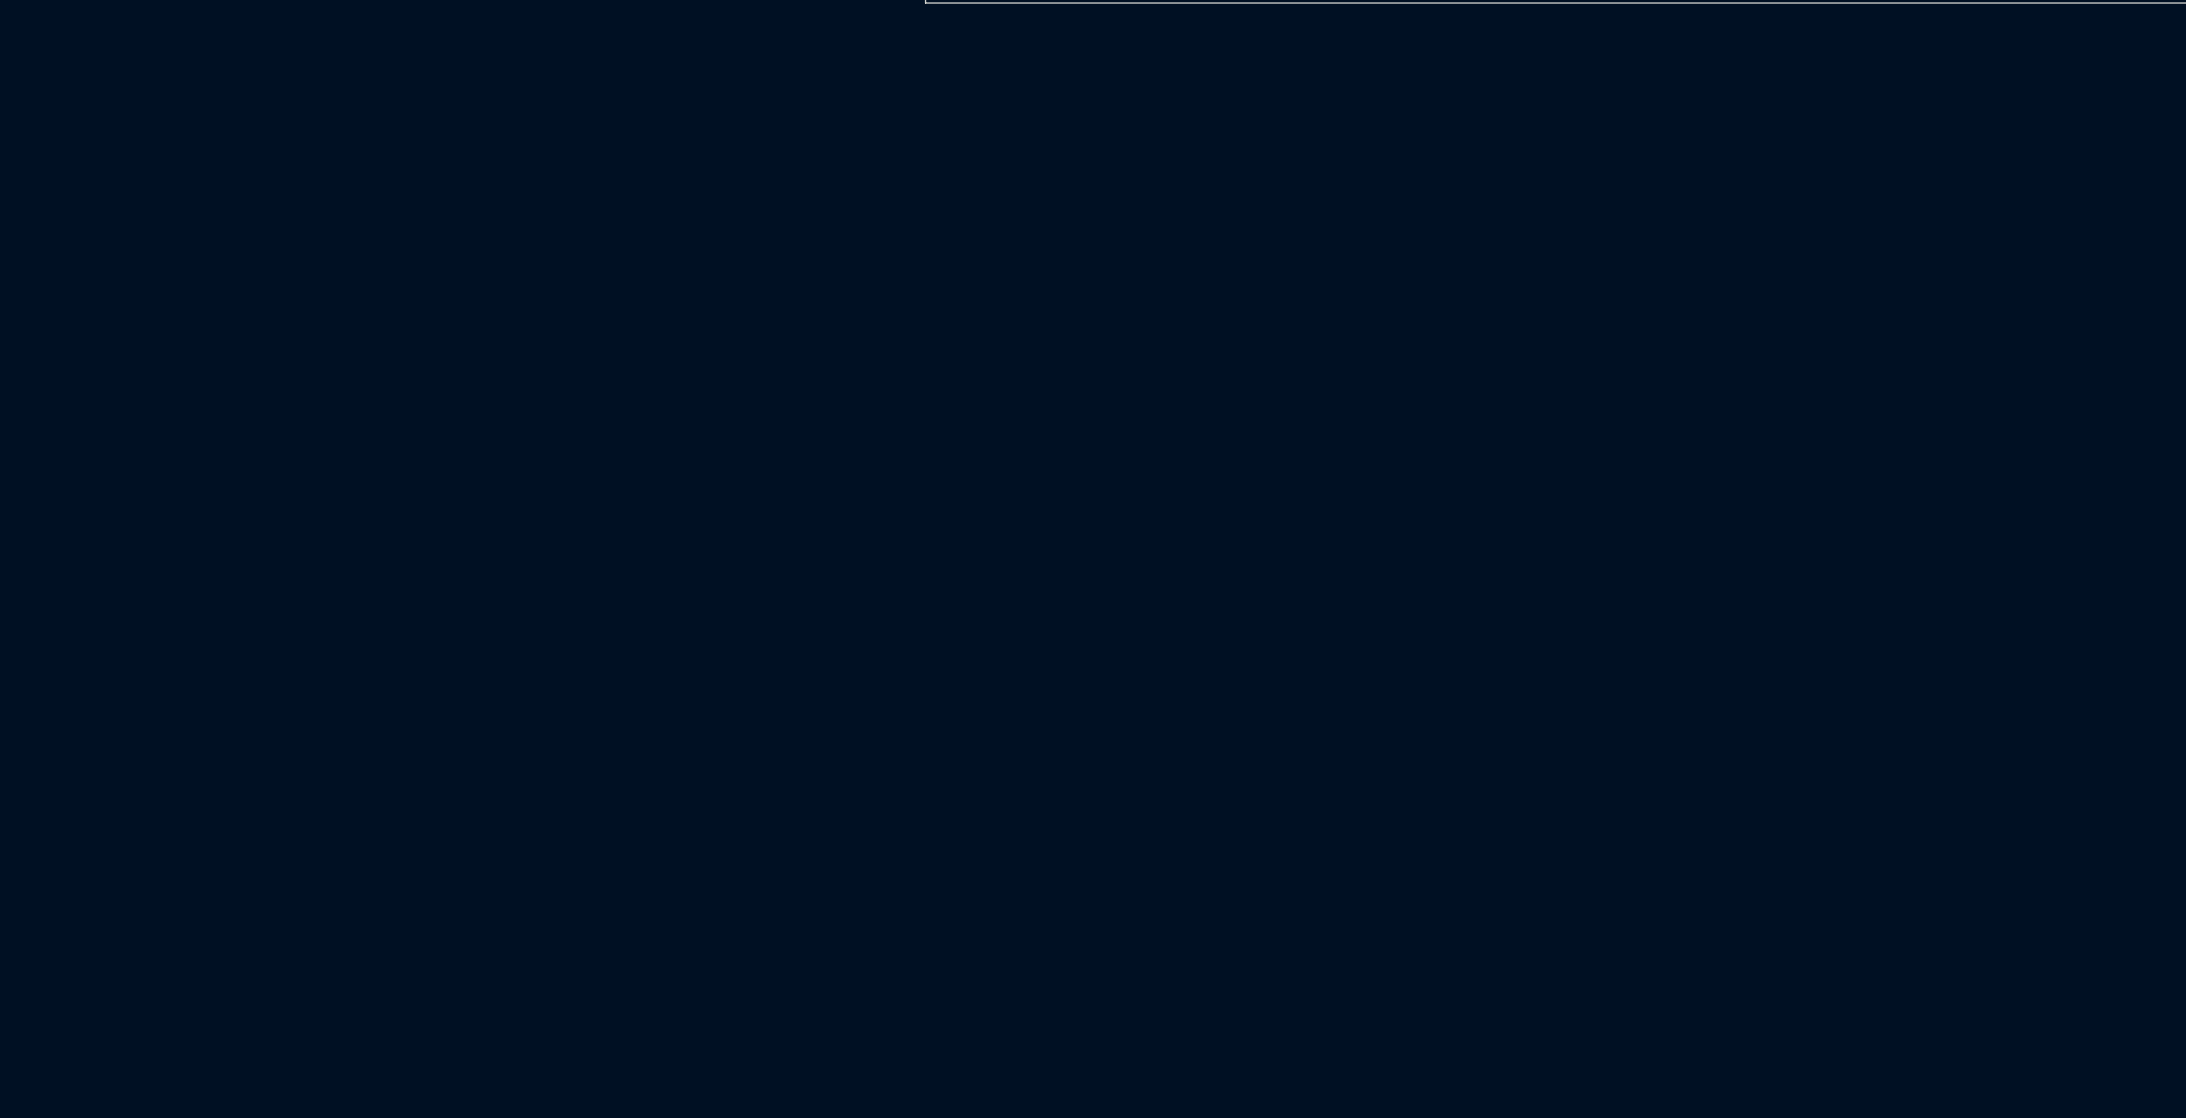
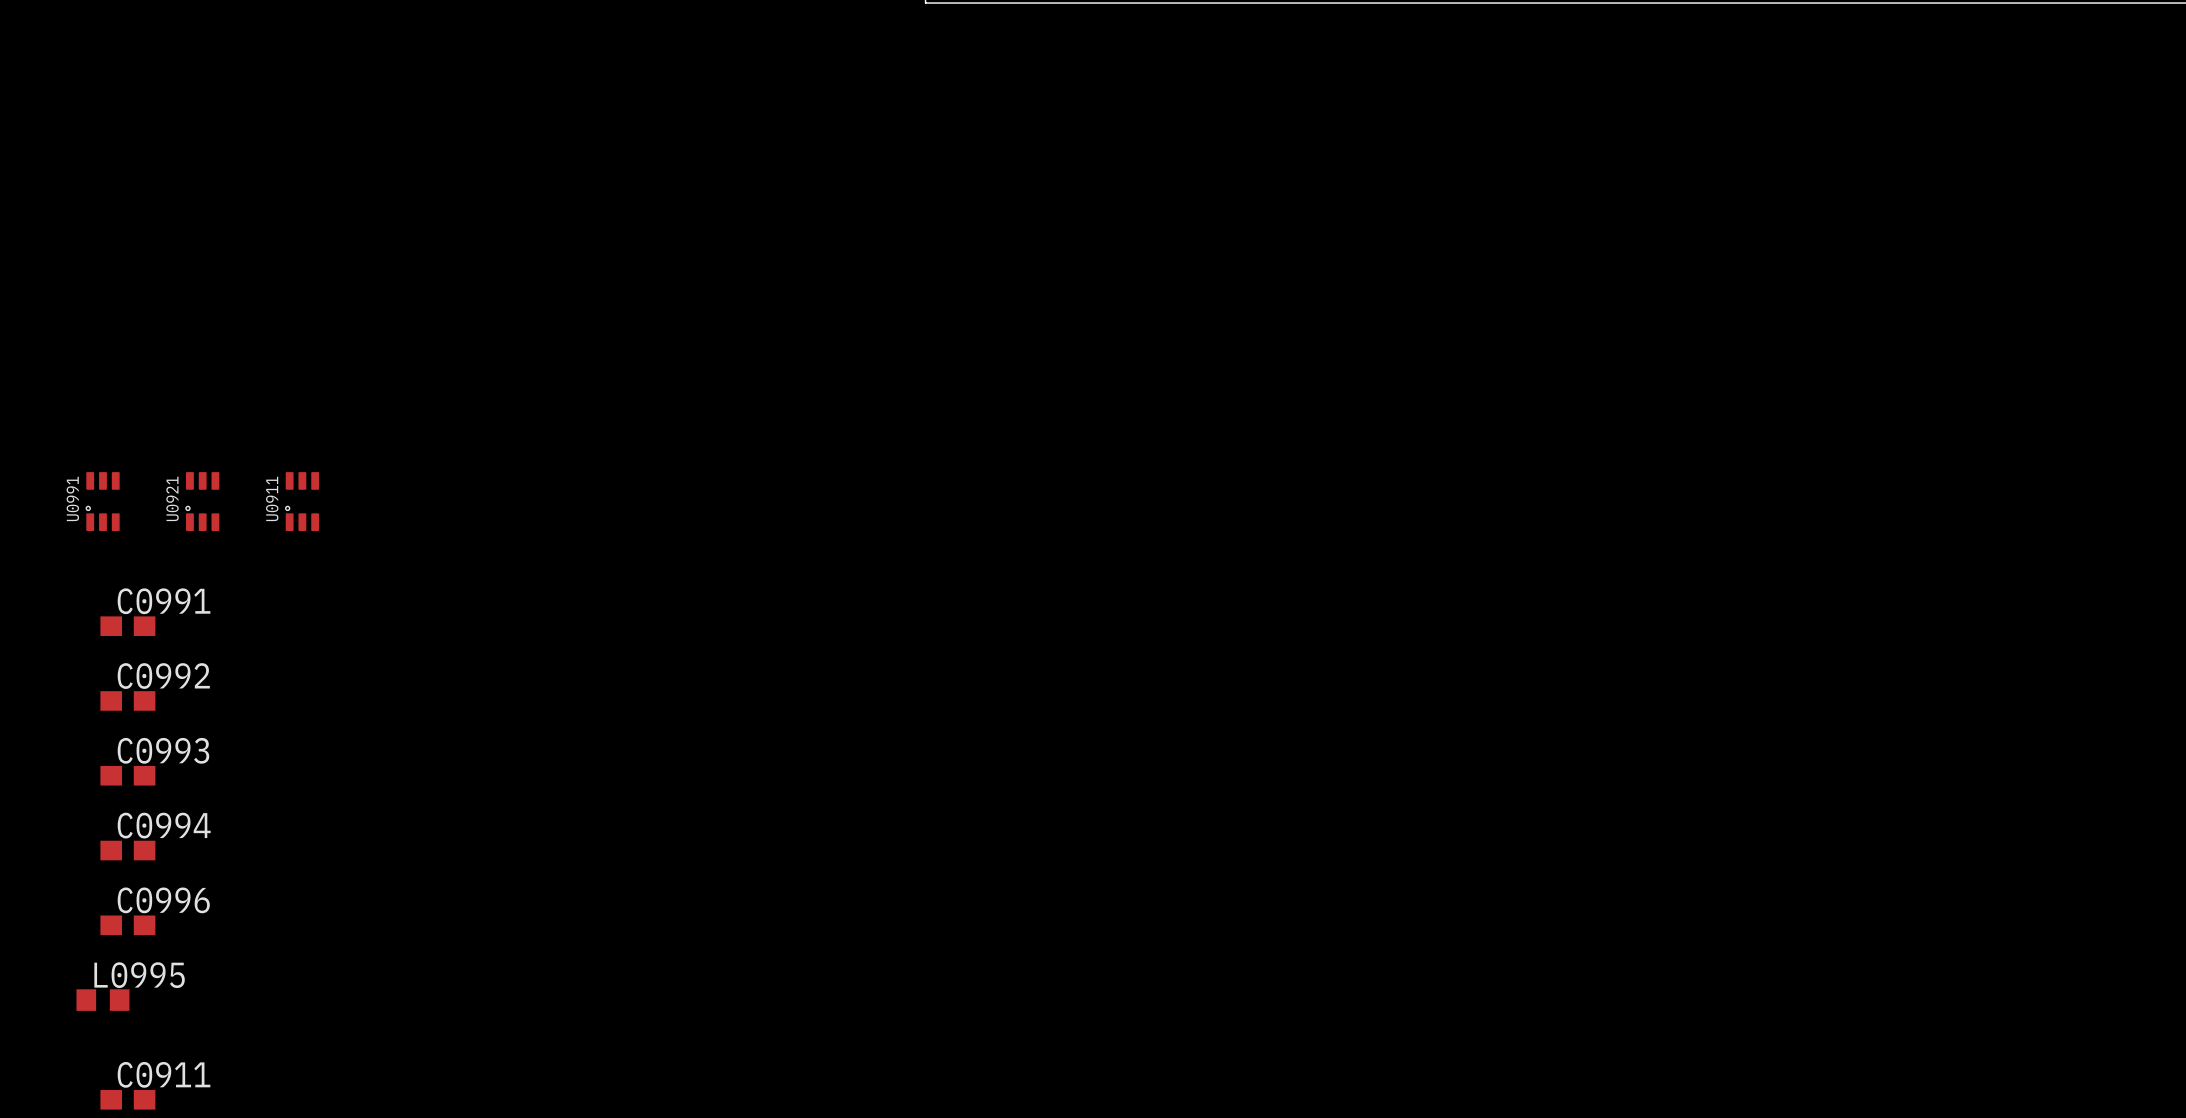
U0991: none -> (102, 501)
U0921: none -> (202, 501)
U0911: none -> (302, 501)
C0991: none -> (127, 626)
C0992: none -> (127, 700)
C0993: none -> (127, 775)
C0994: none -> (127, 850)
C0996: none -> (127, 925)
L0995: none -> (102, 1000)
C0911: none -> (127, 1099)

